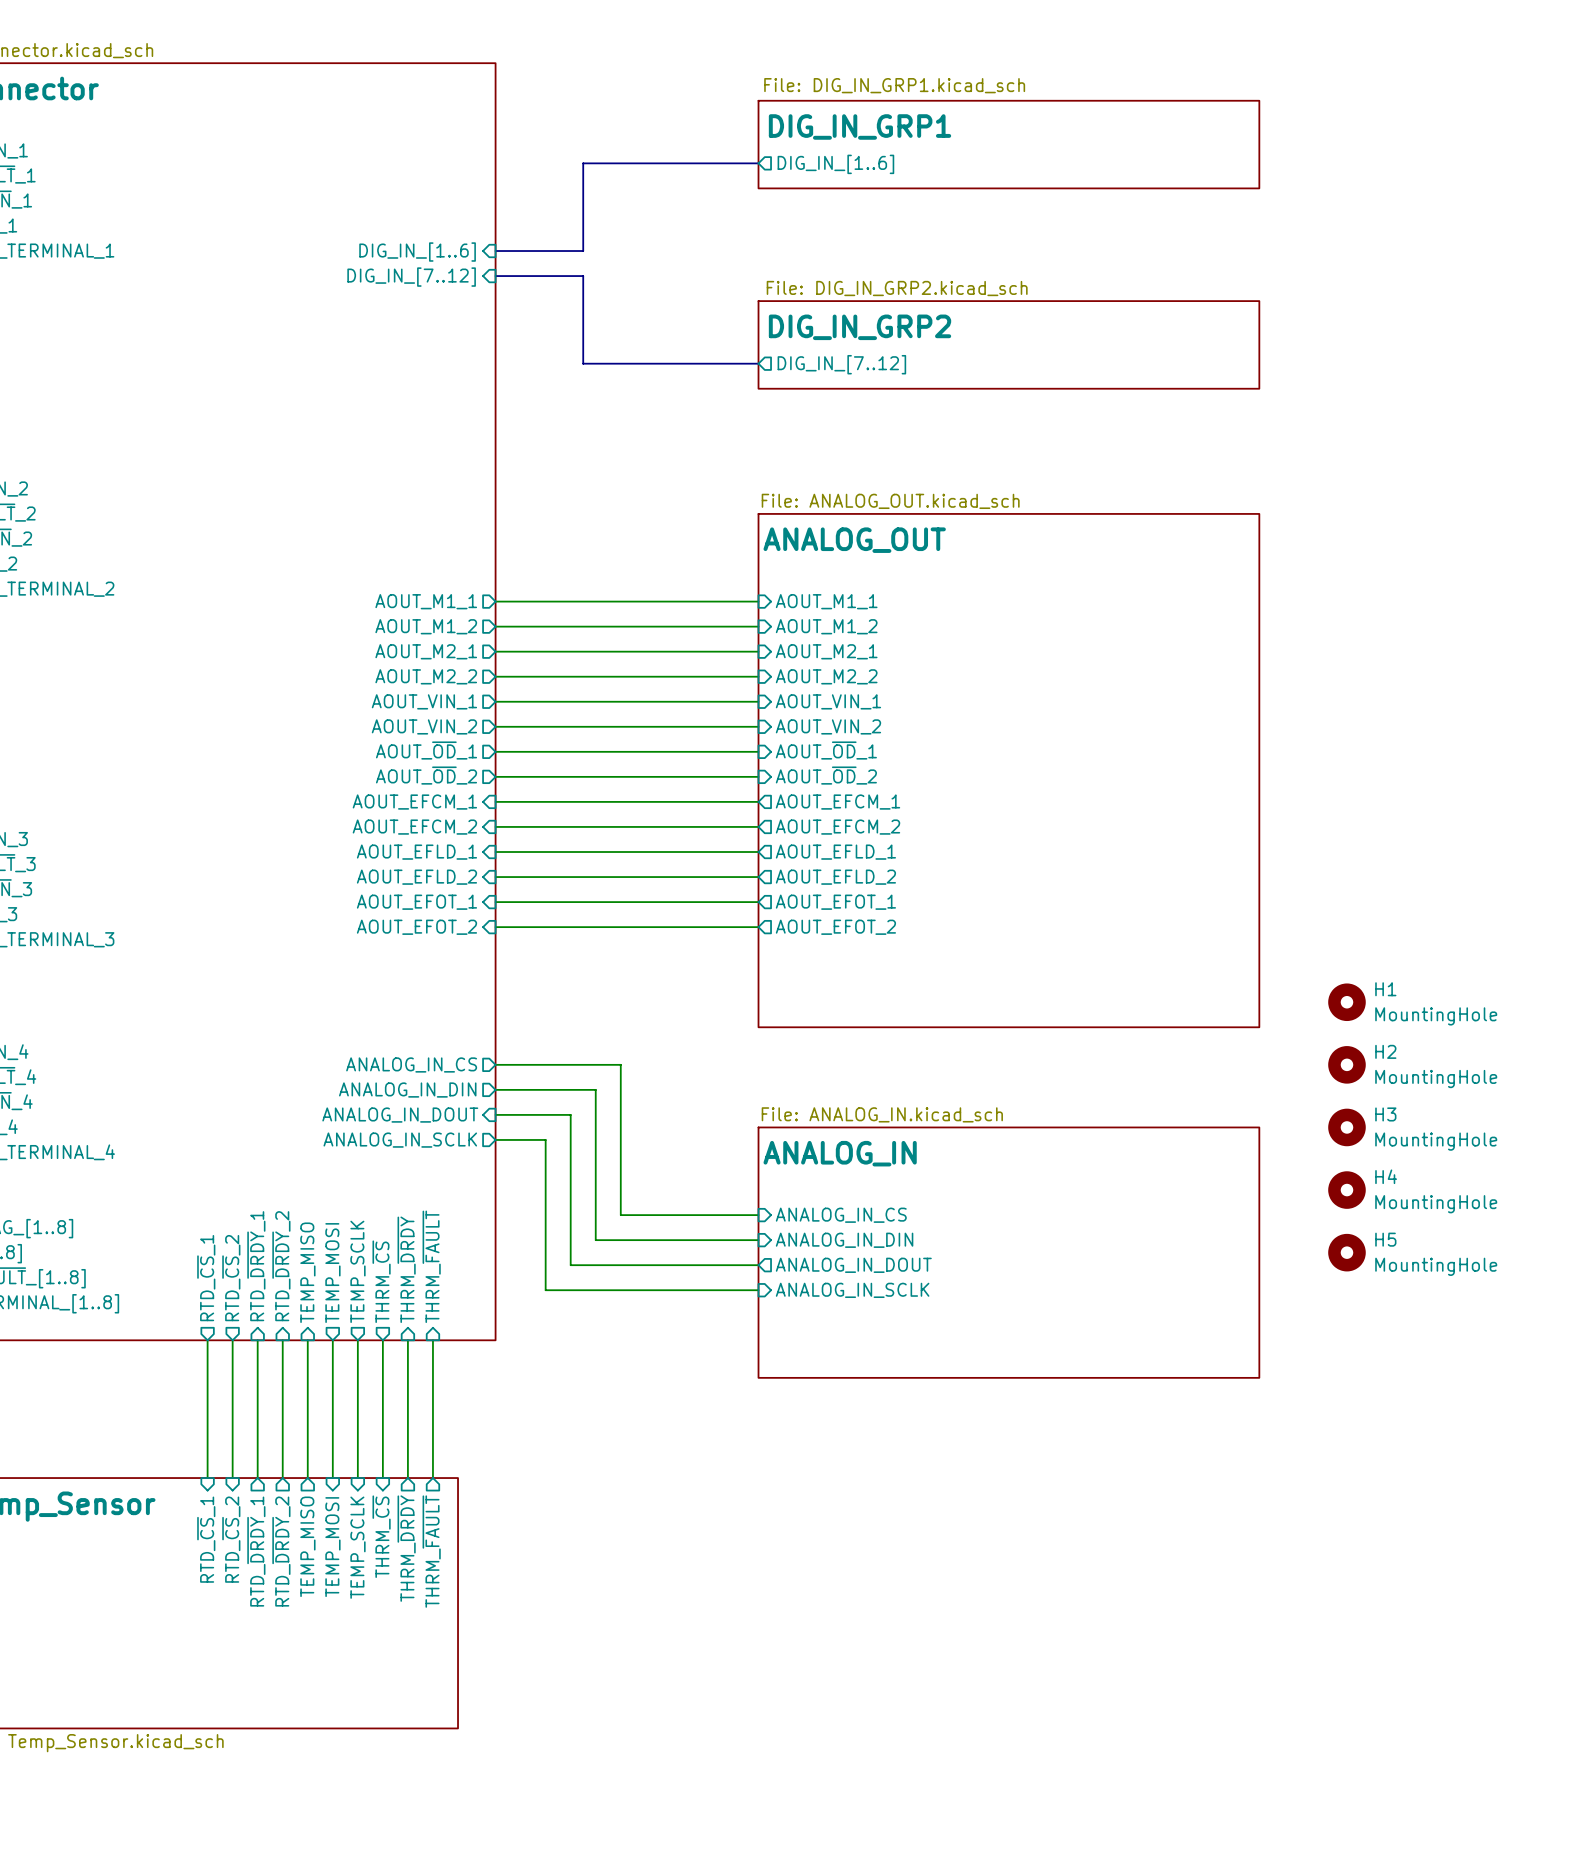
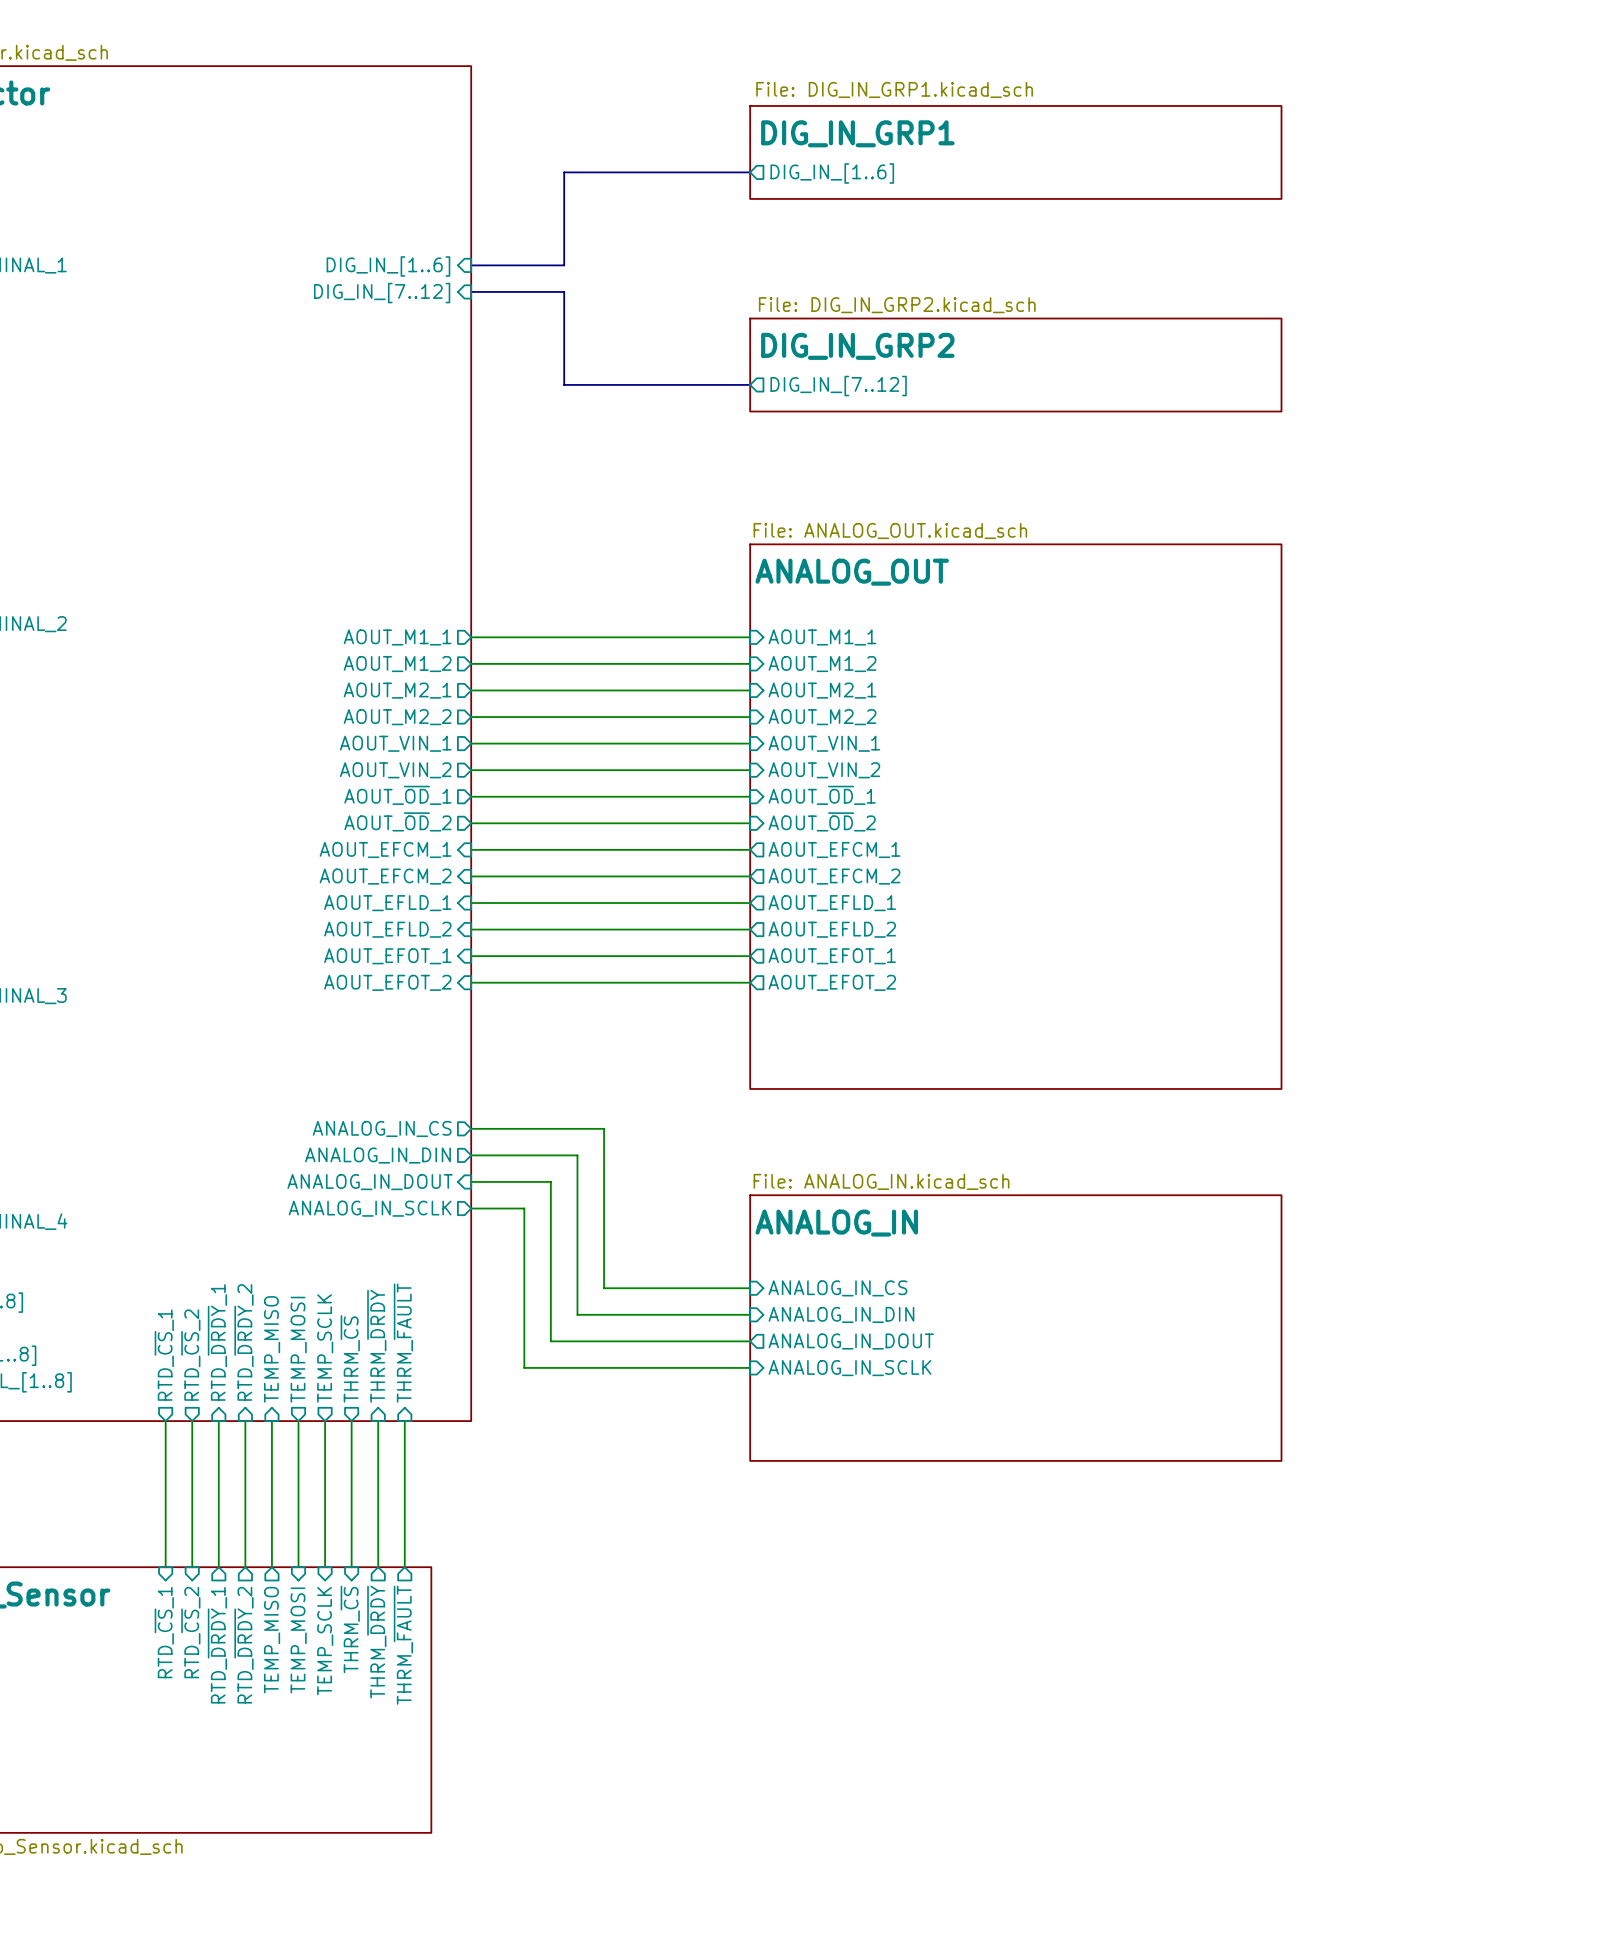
H1: MountingHole (1346, 1002) -> none
H2: MountingHole (1346, 1064) -> none
H3: MountingHole (1346, 1127) -> none
H4: MountingHole (1346, 1190) -> none
H5: MountingHole (1346, 1252) -> none

